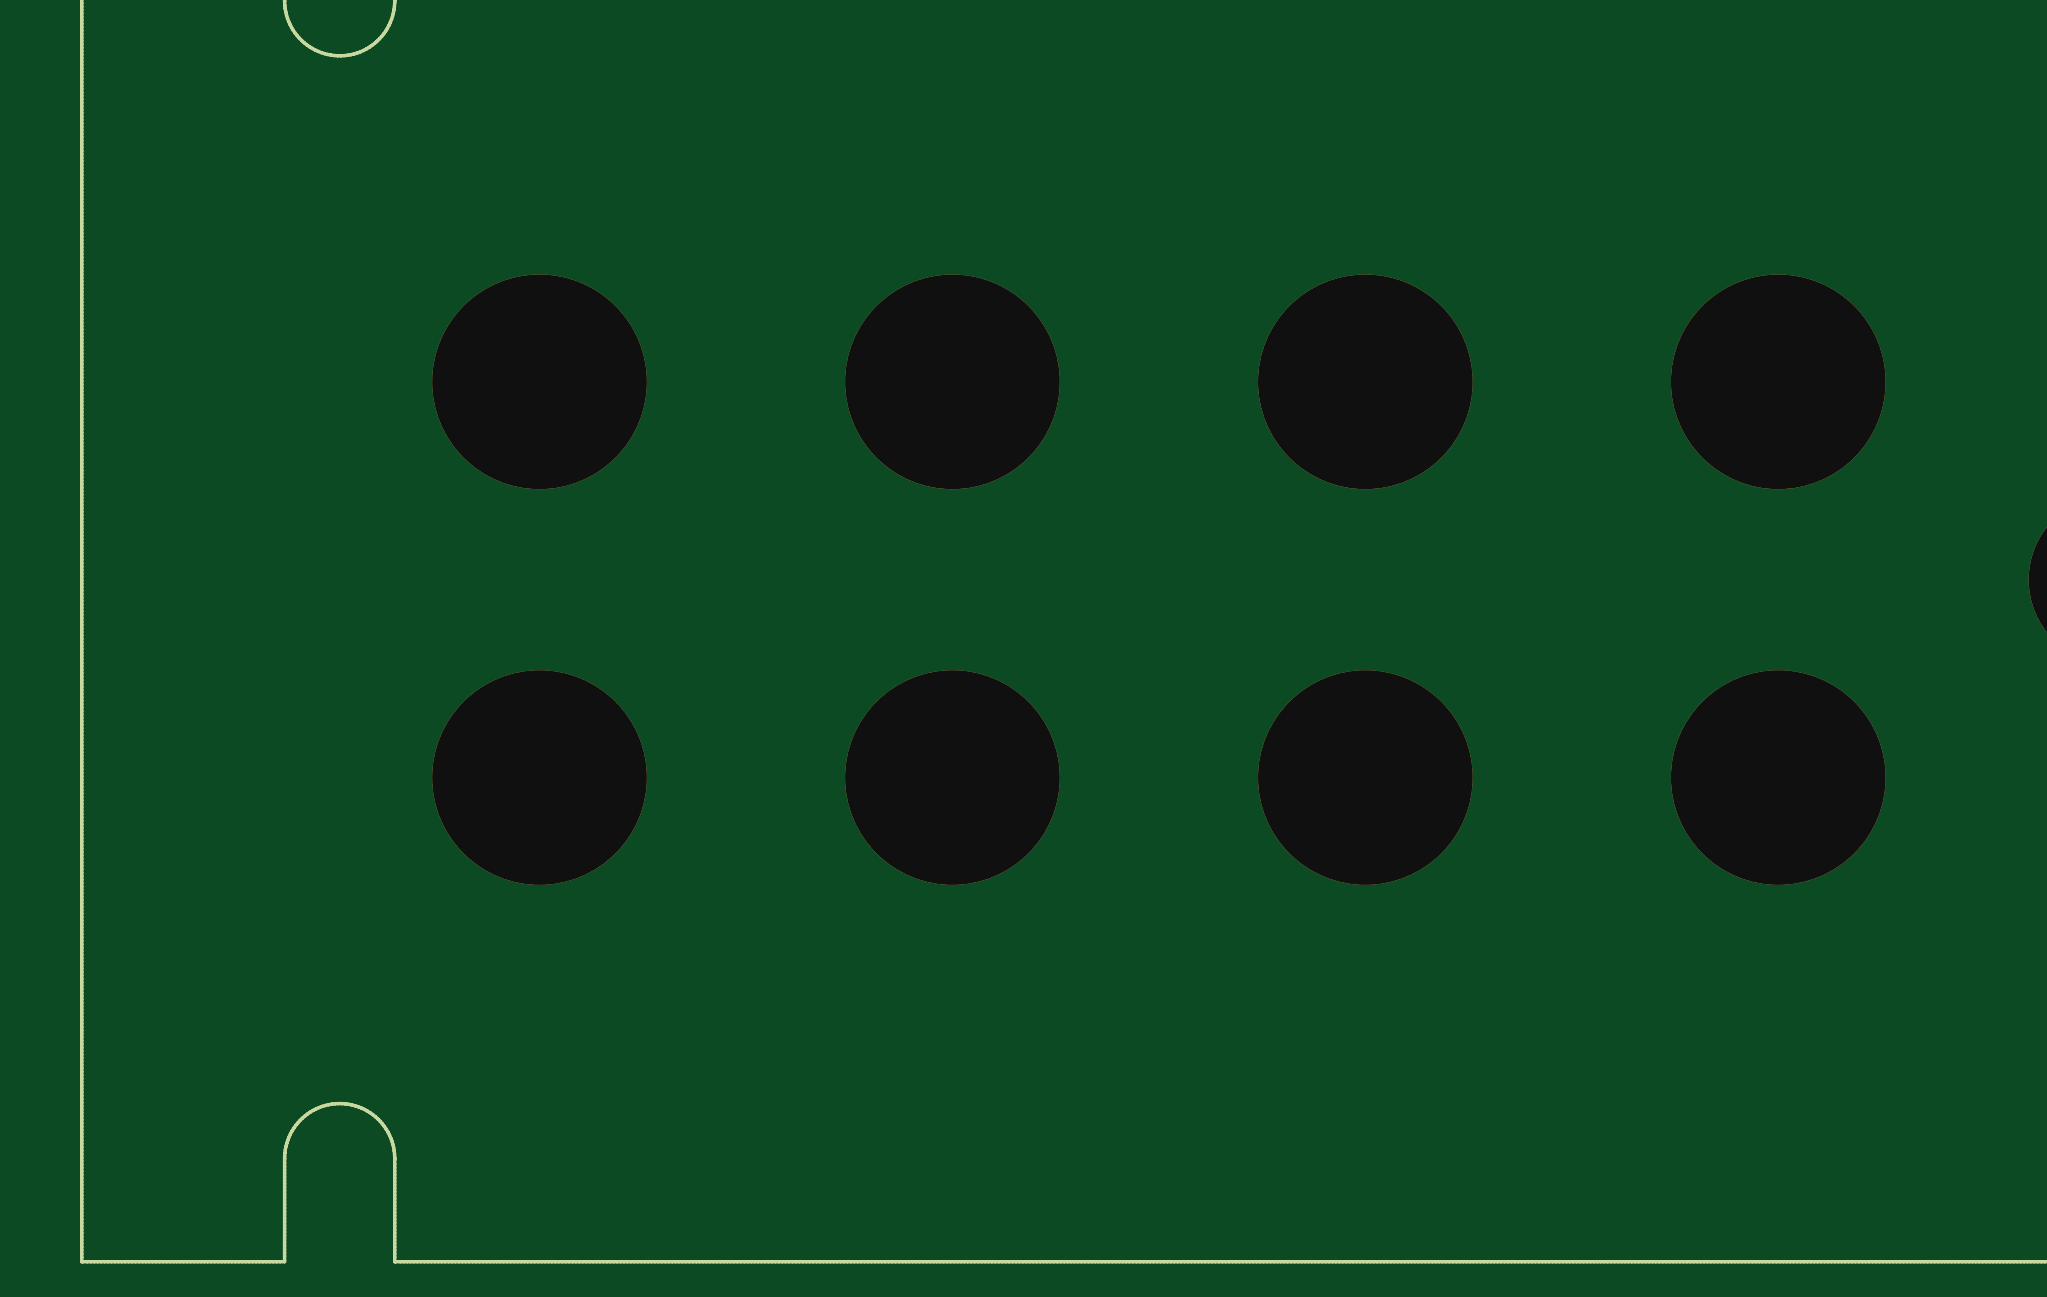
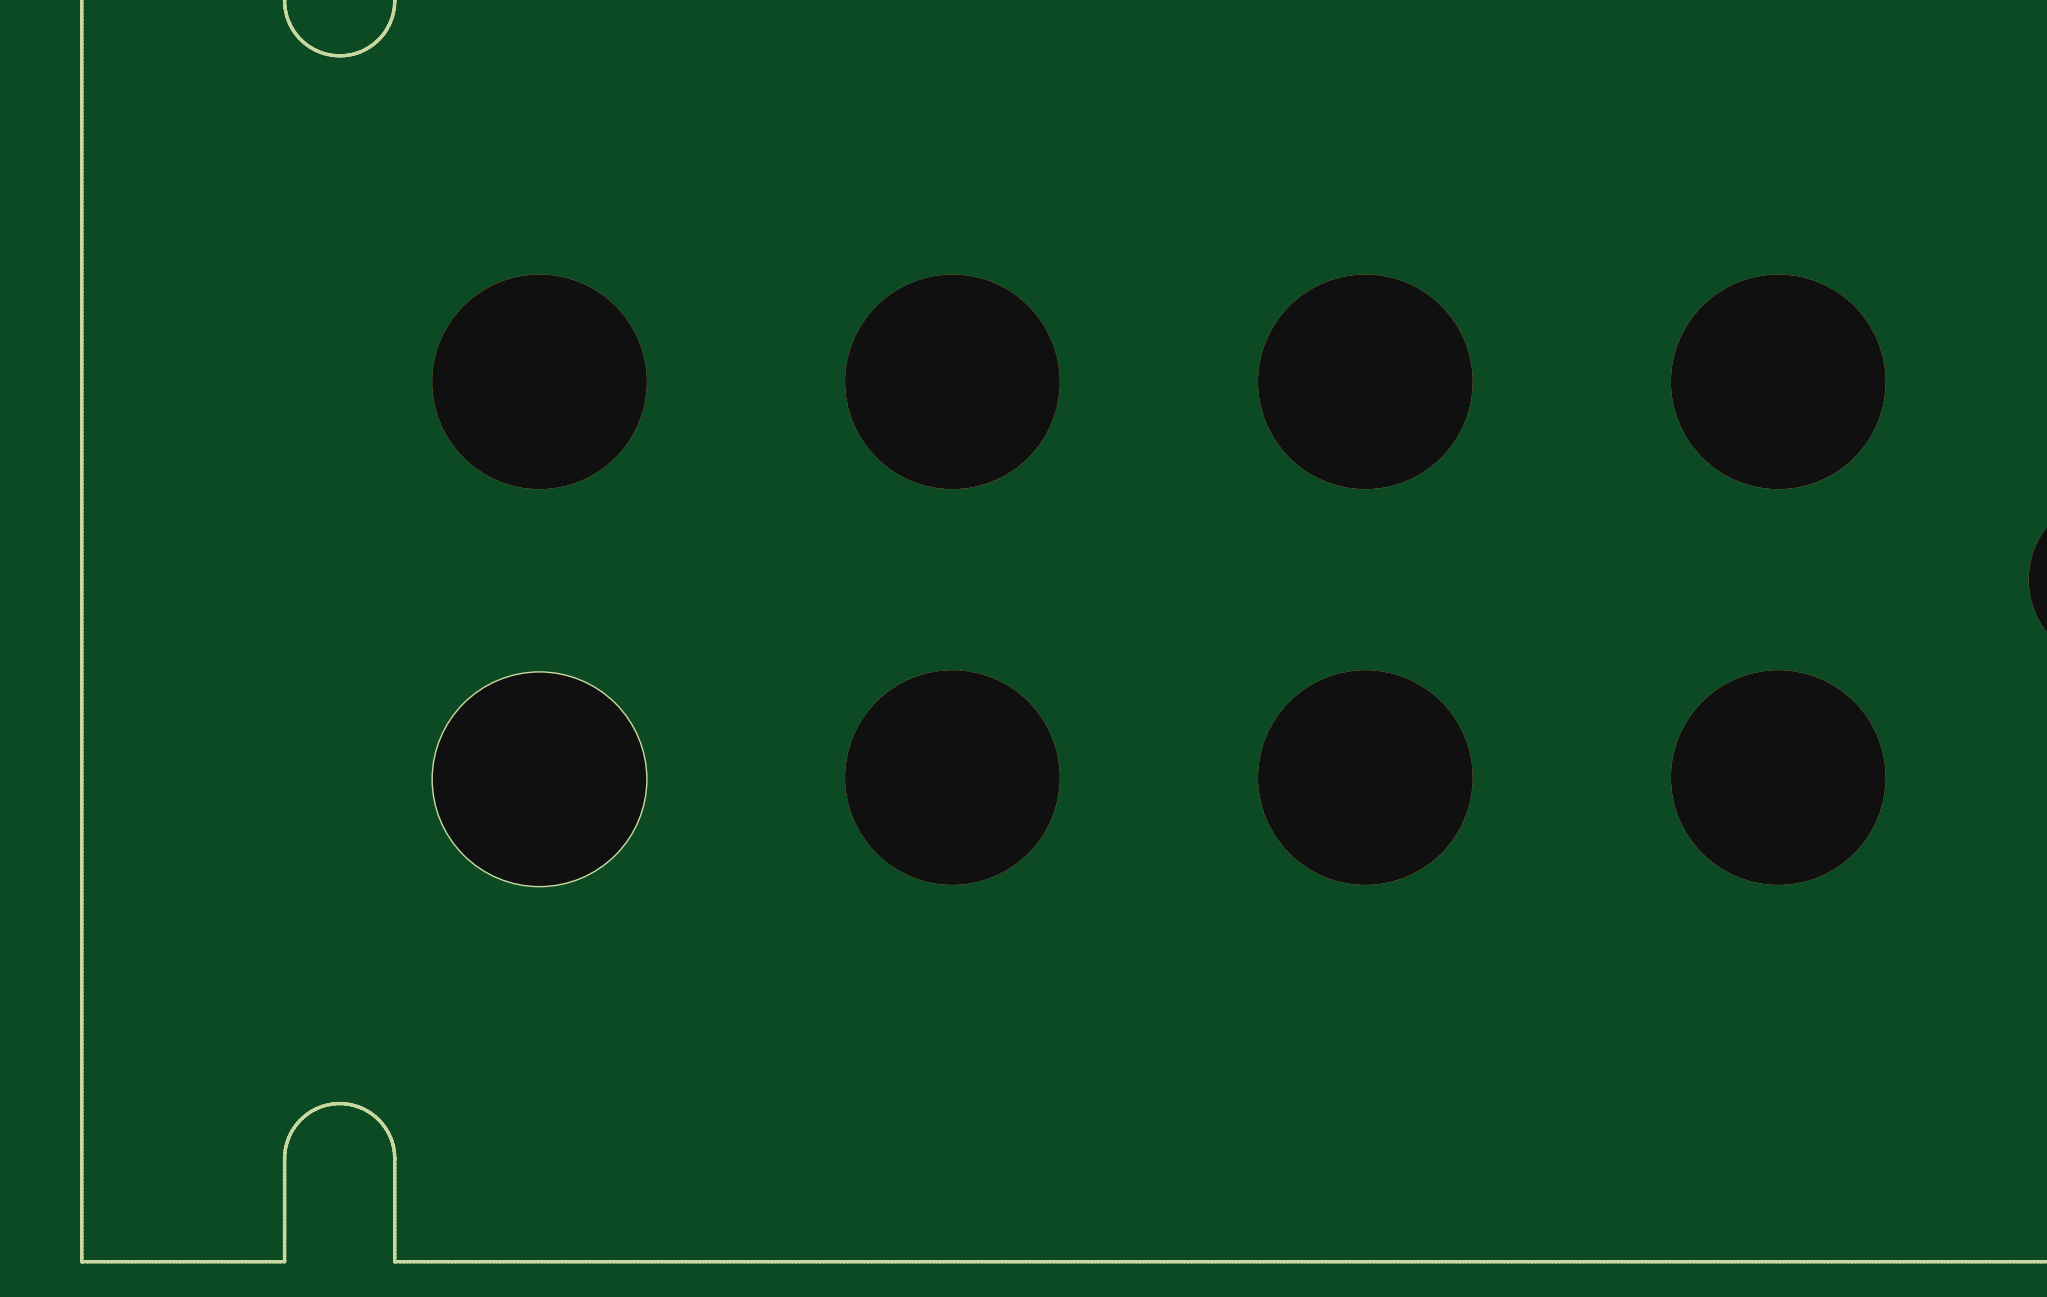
part footprint: [432, 670, 647, 885] -> [432, 671, 647, 887]

